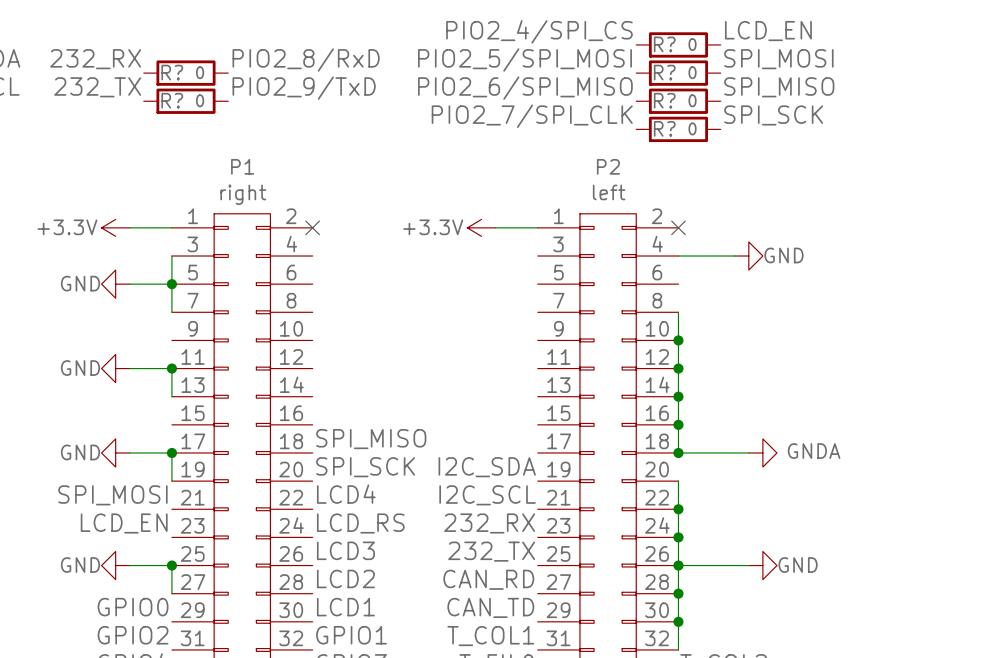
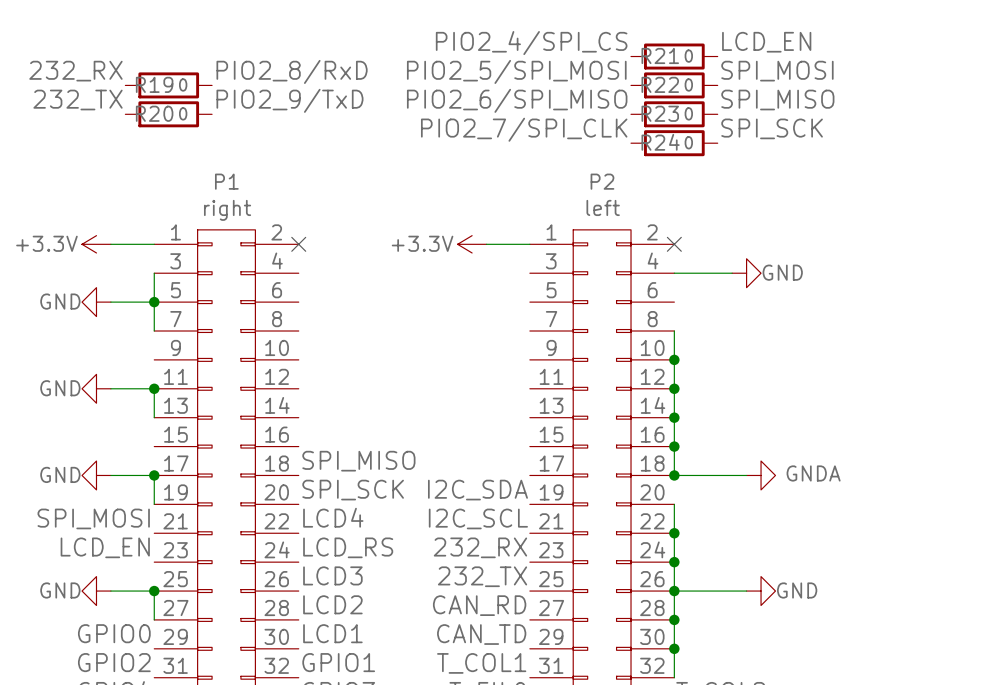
R? name: R? (664, 44) -> R21 (660, 55)
R? name: R? (172, 72) -> R19 (154, 84)
R? name: R? (664, 72) -> R22 (660, 84)
R? name: R? (172, 100) -> R20 (154, 113)
R? name: R? (664, 100) -> R23 (660, 113)
R? name: R? (664, 128) -> R24 (660, 142)

